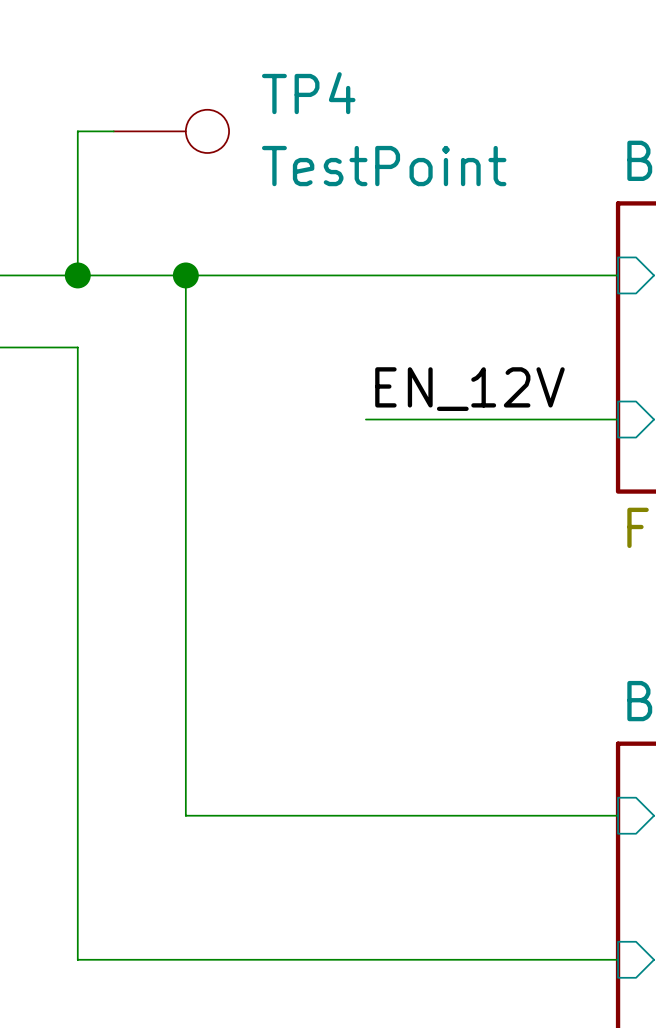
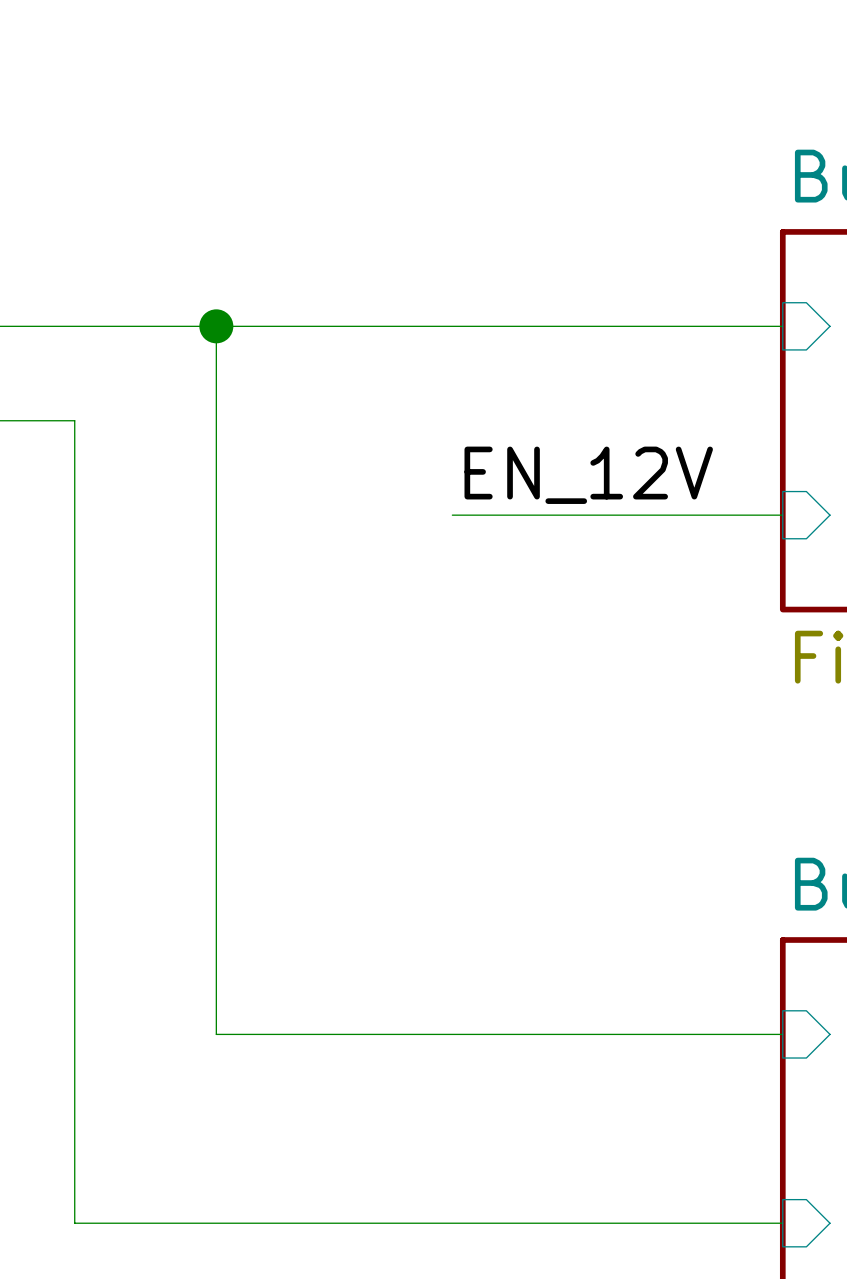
wire: (113, 131) (77, 131) (77, 275) -> none
TP4: TestPoint (171, 131) -> none
junction: (77, 275) -> none

